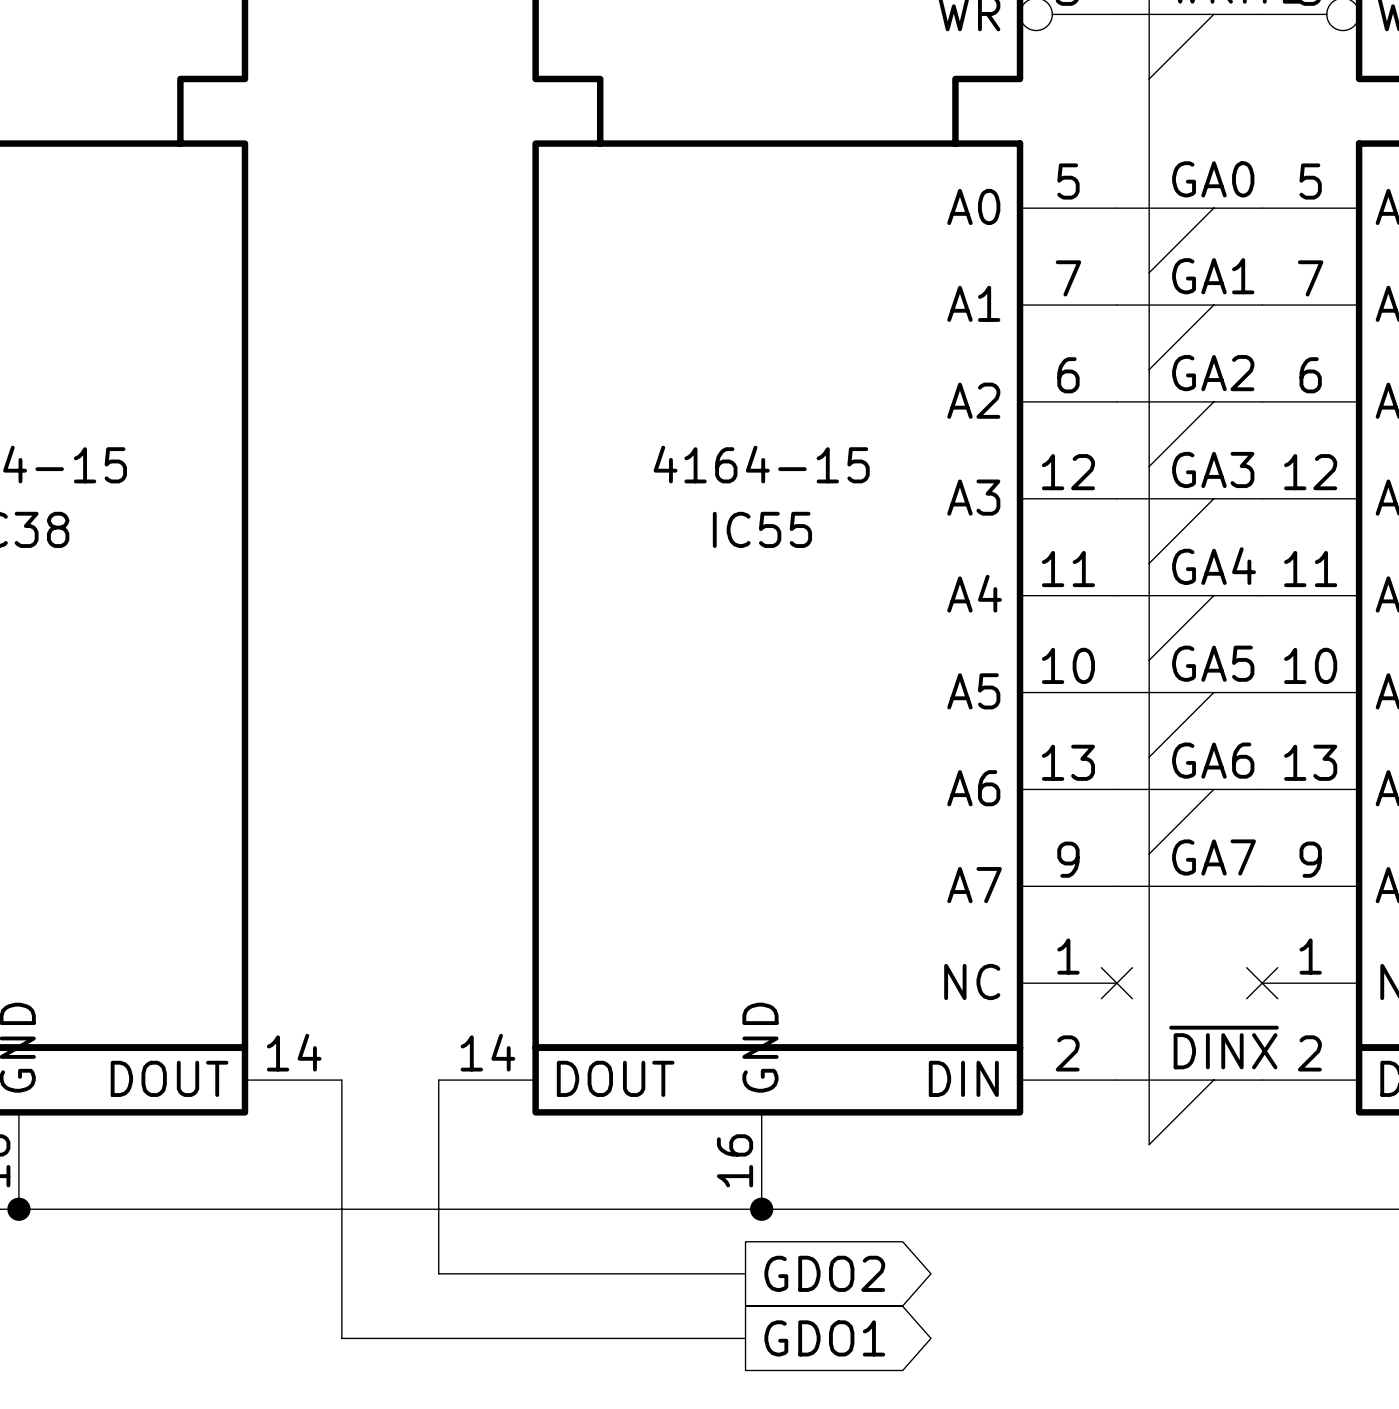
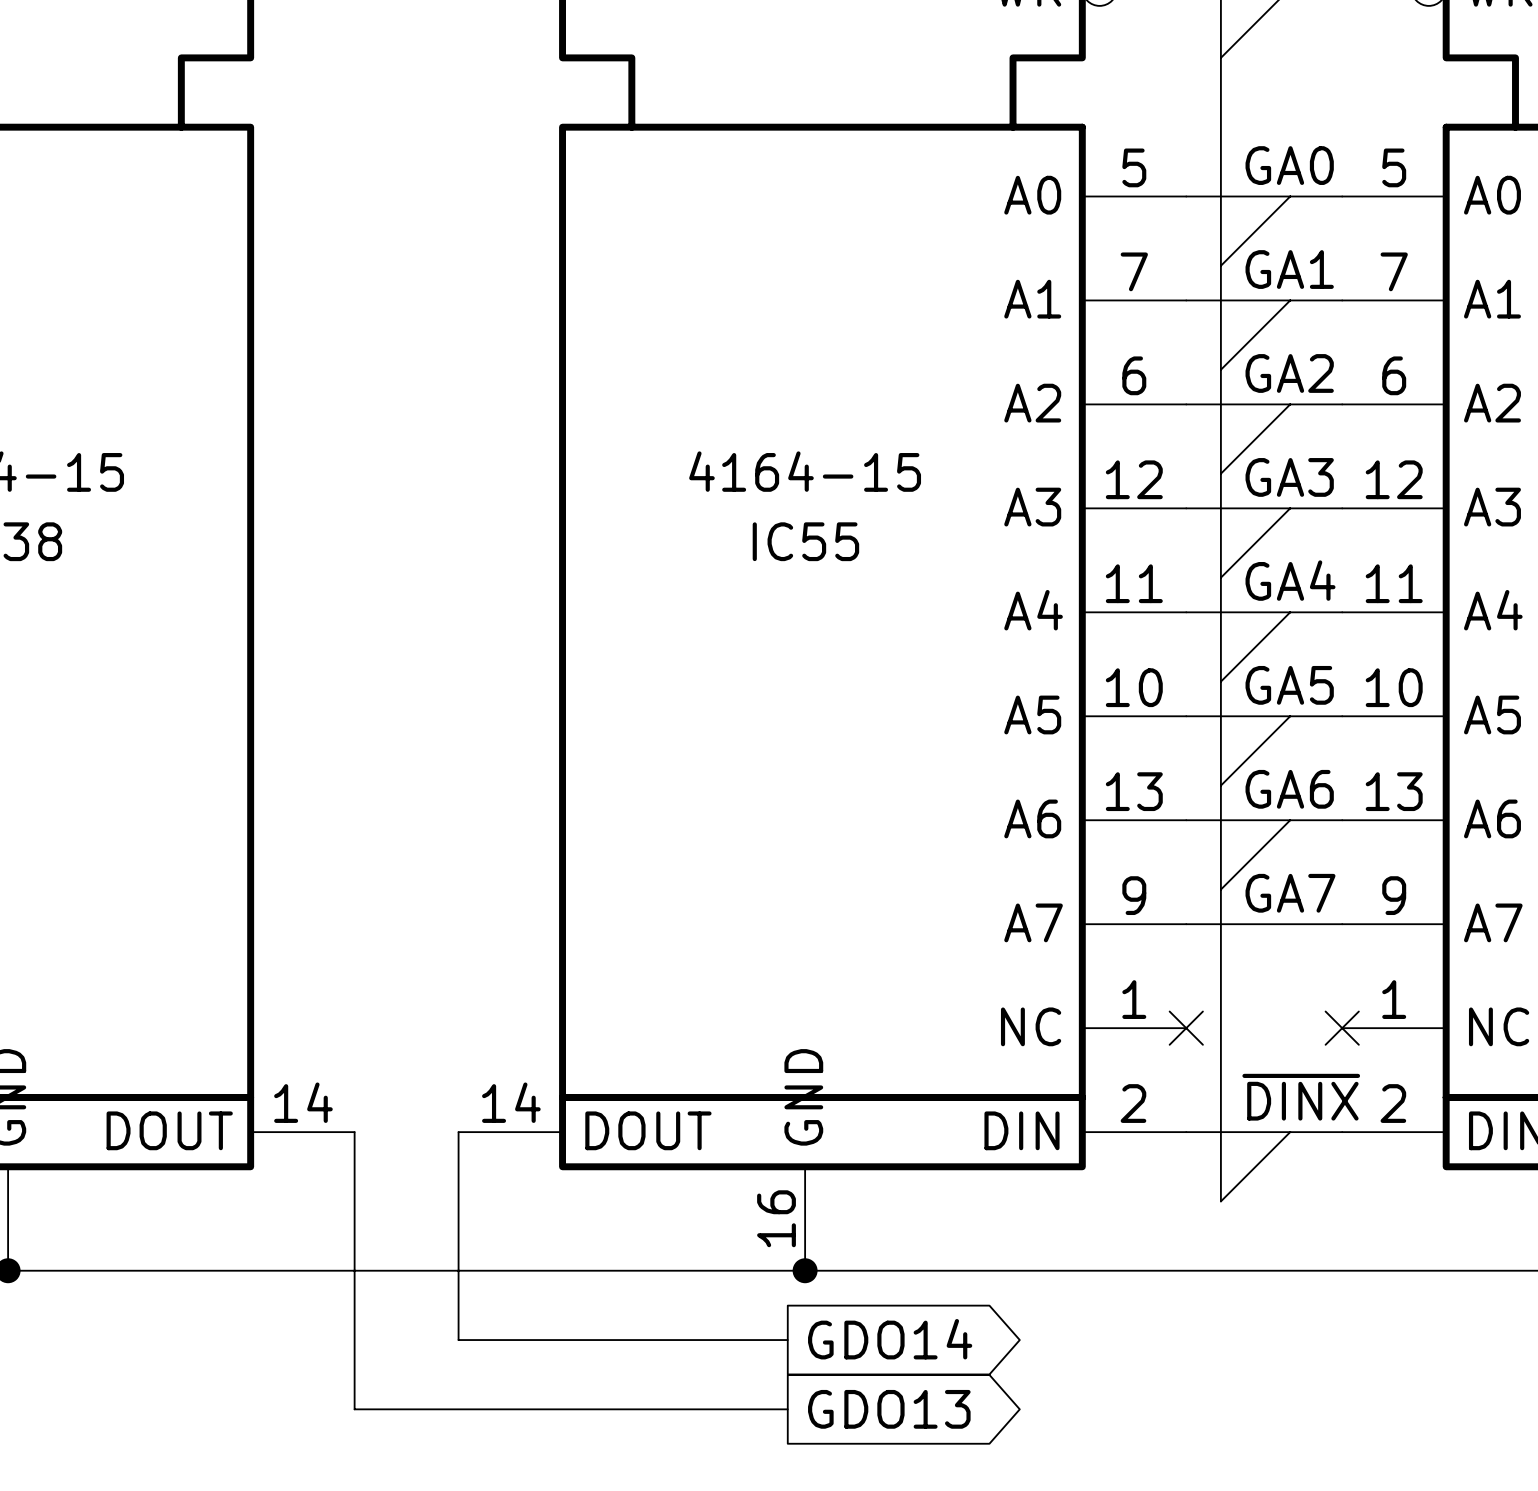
global label: GDO2 (824, 1273) -> GDO14 (890, 1339)
global label: GDO1 (824, 1338) -> GDO13 (889, 1409)

